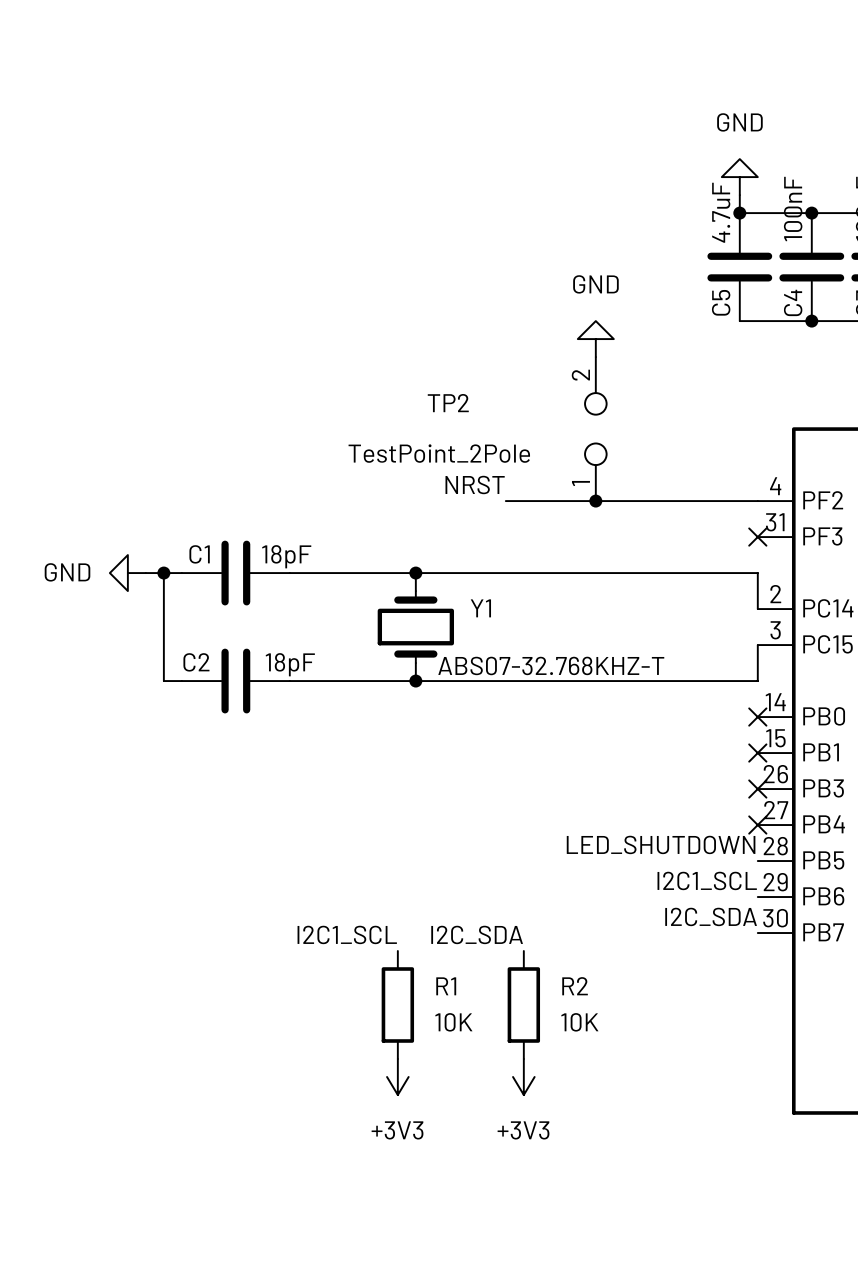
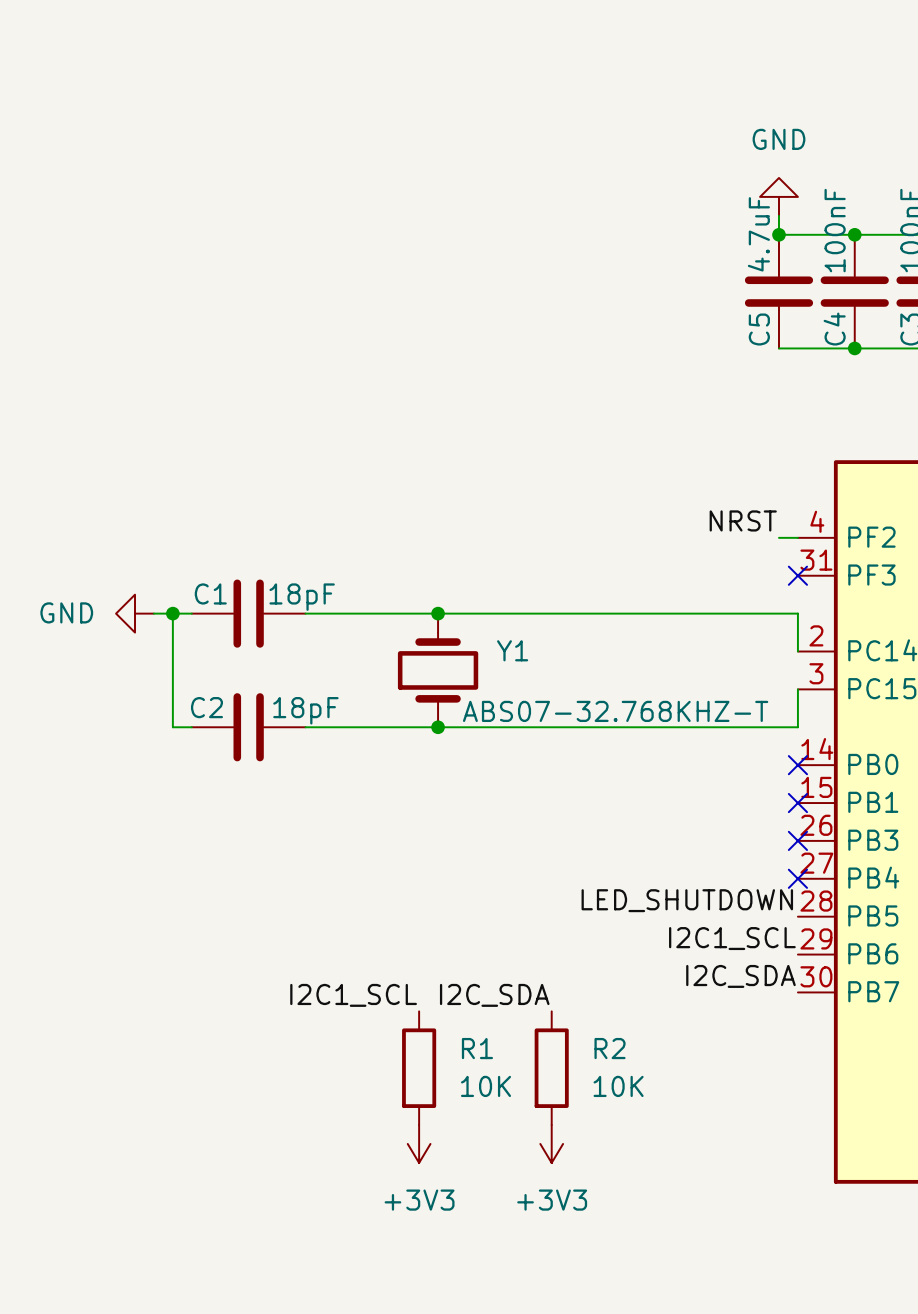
power symbol: GND (595, 339) -> none
TP2: TestPoint_2Pole (595, 429) -> none
label position: NRST (475, 485) -> NRST (743, 520)
wire: (505, 501) (739, 501) -> none
junction: (595, 501) -> none

